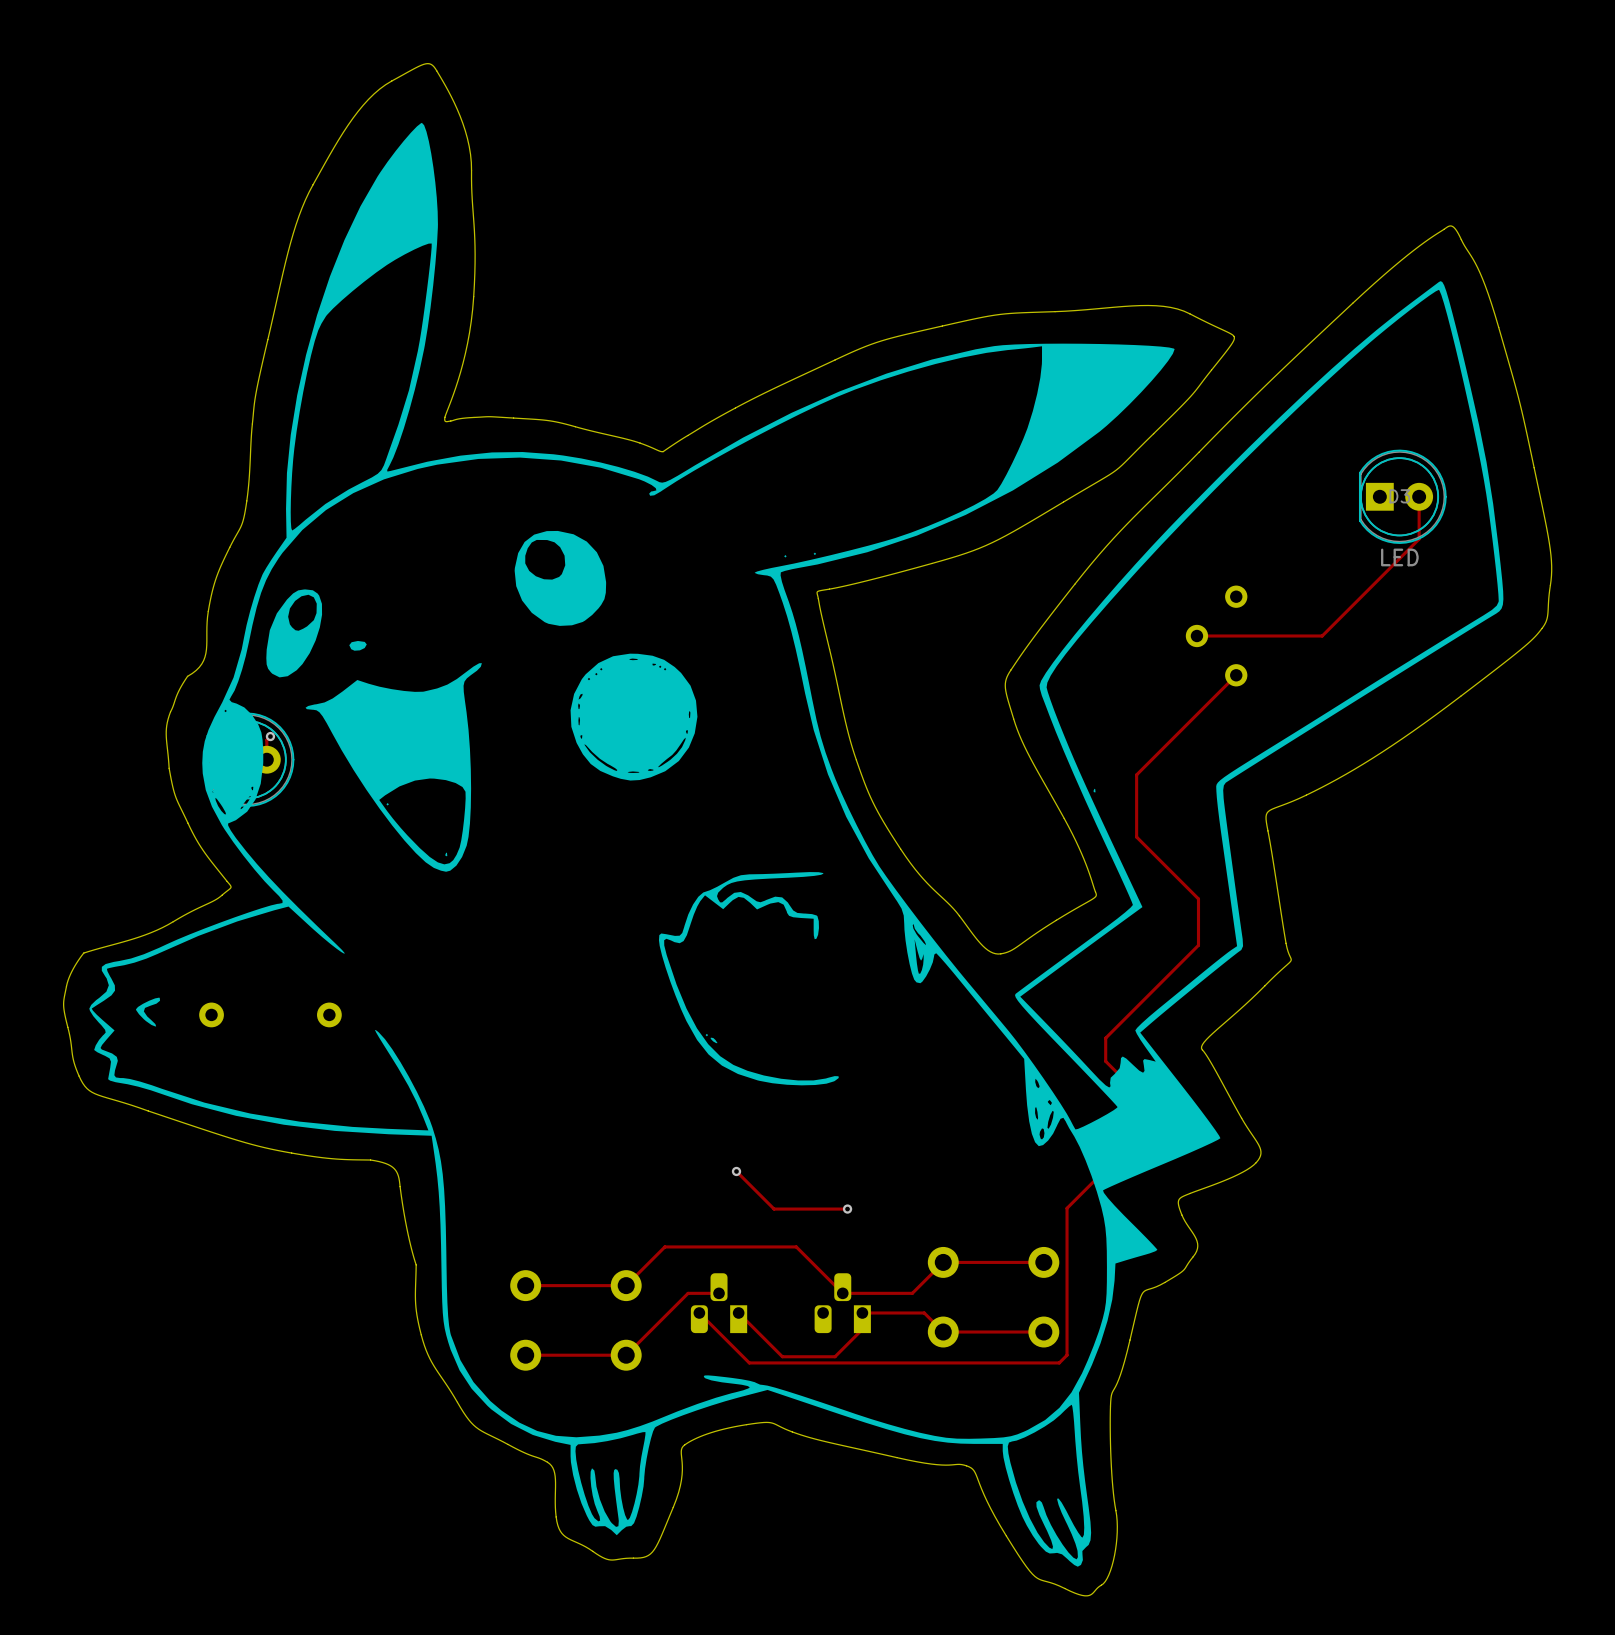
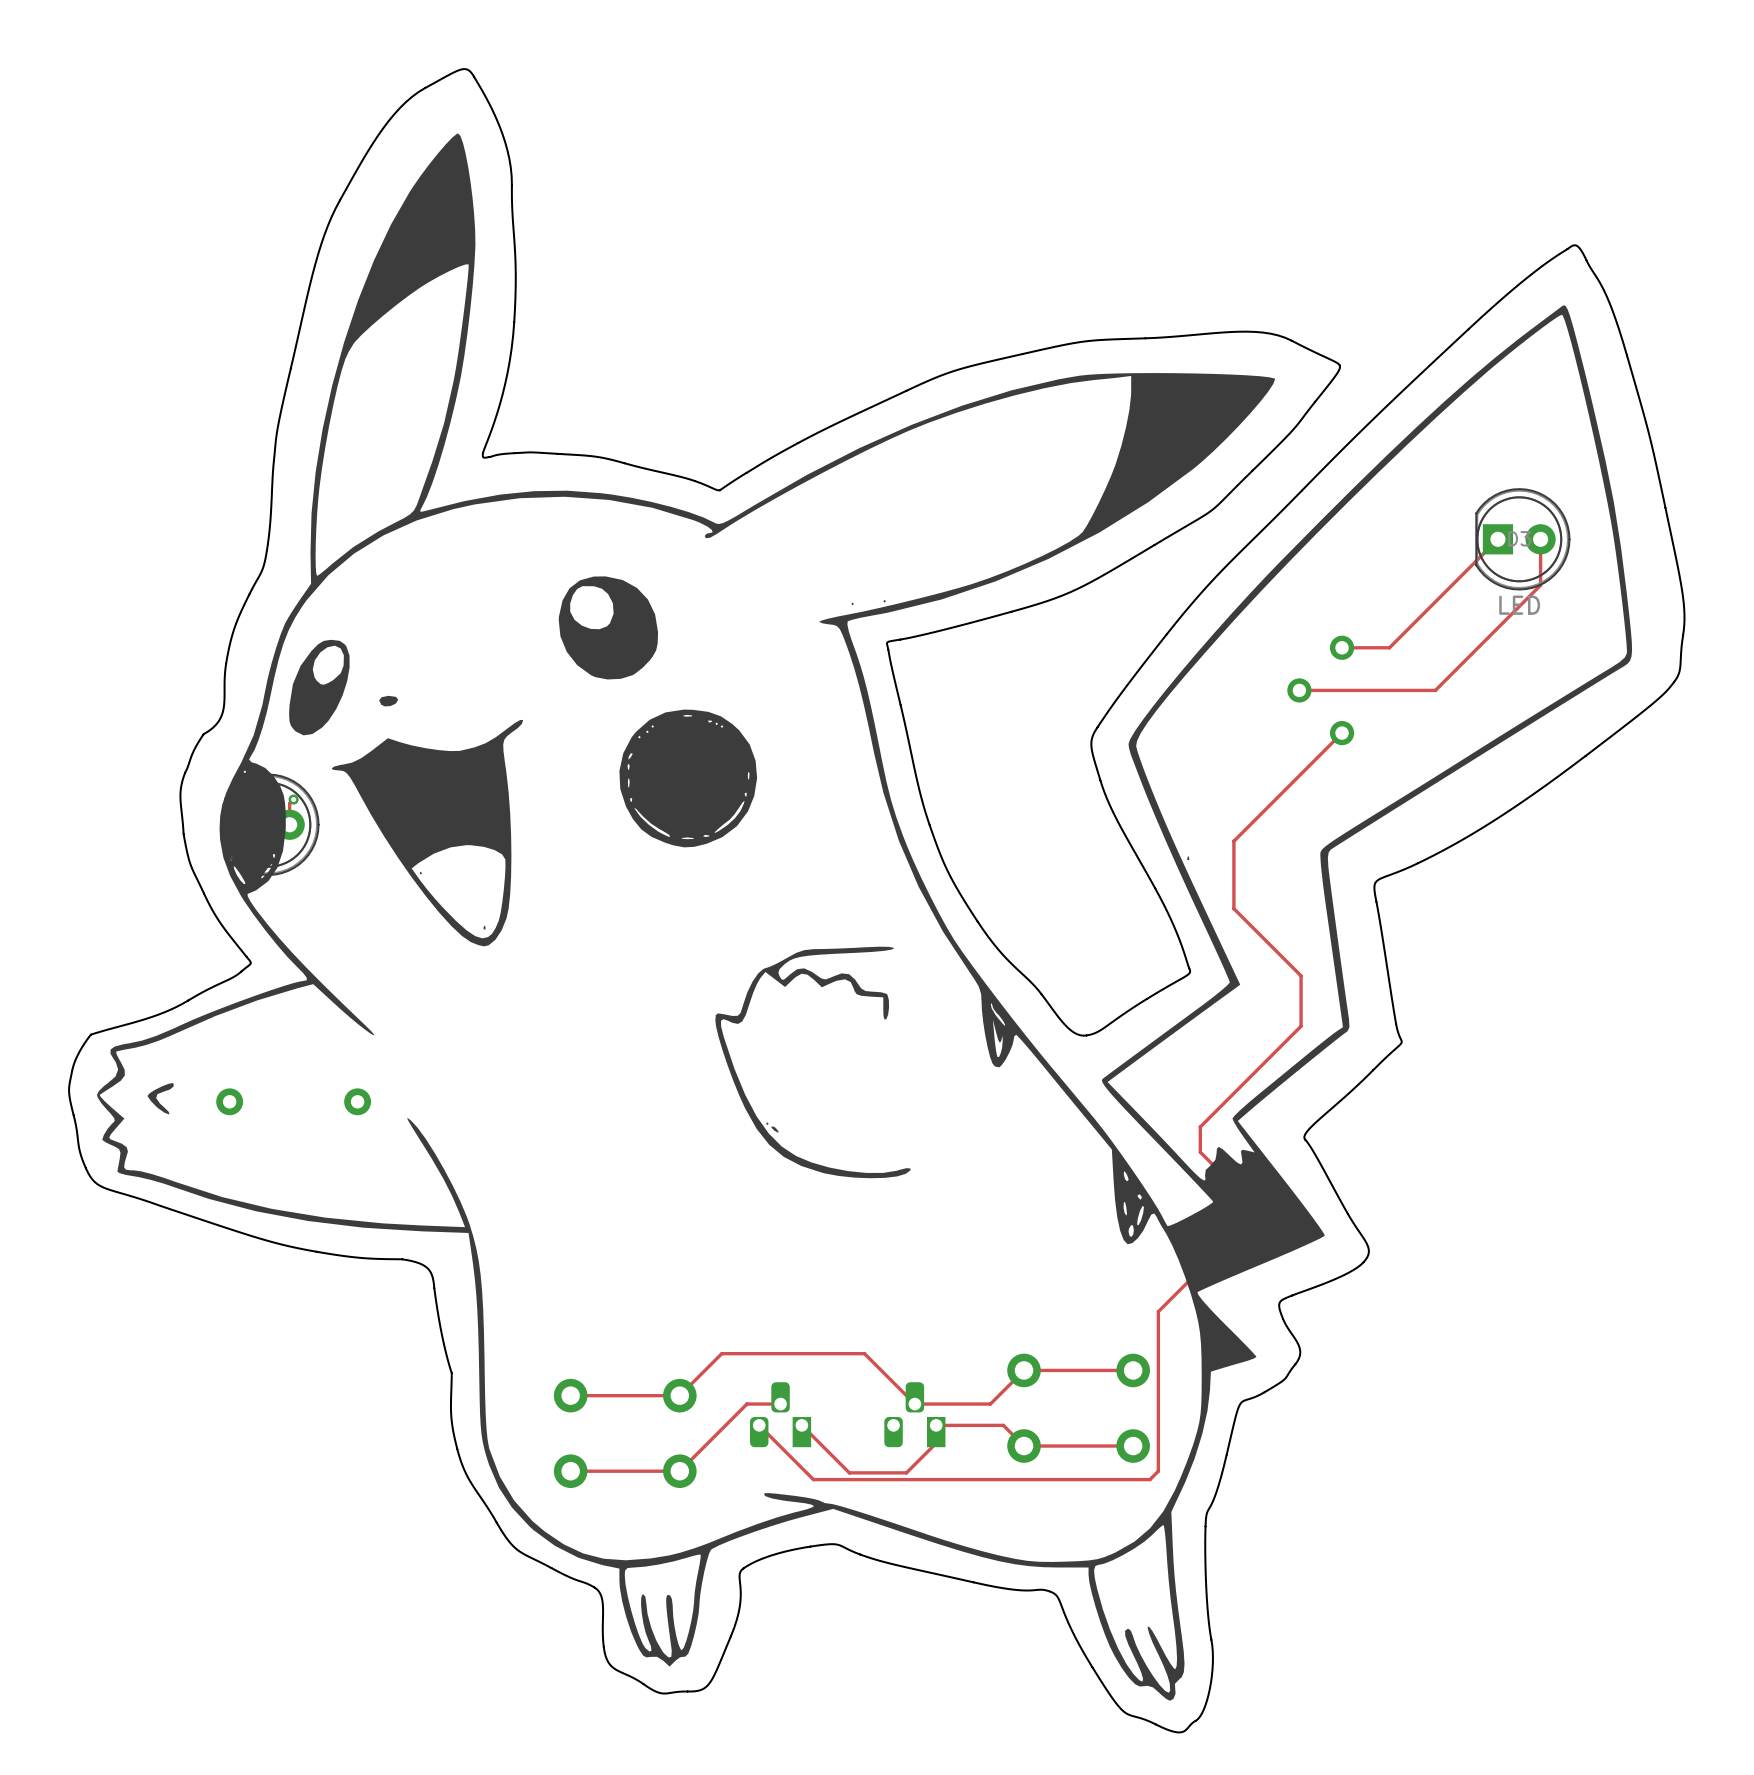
track: none -> (1497, 539) (1389, 647) (1342, 647)
track: (736, 1171) (774, 1209) (847, 1209) -> none
via: (736, 1171) -> none
via: (847, 1209) -> none

